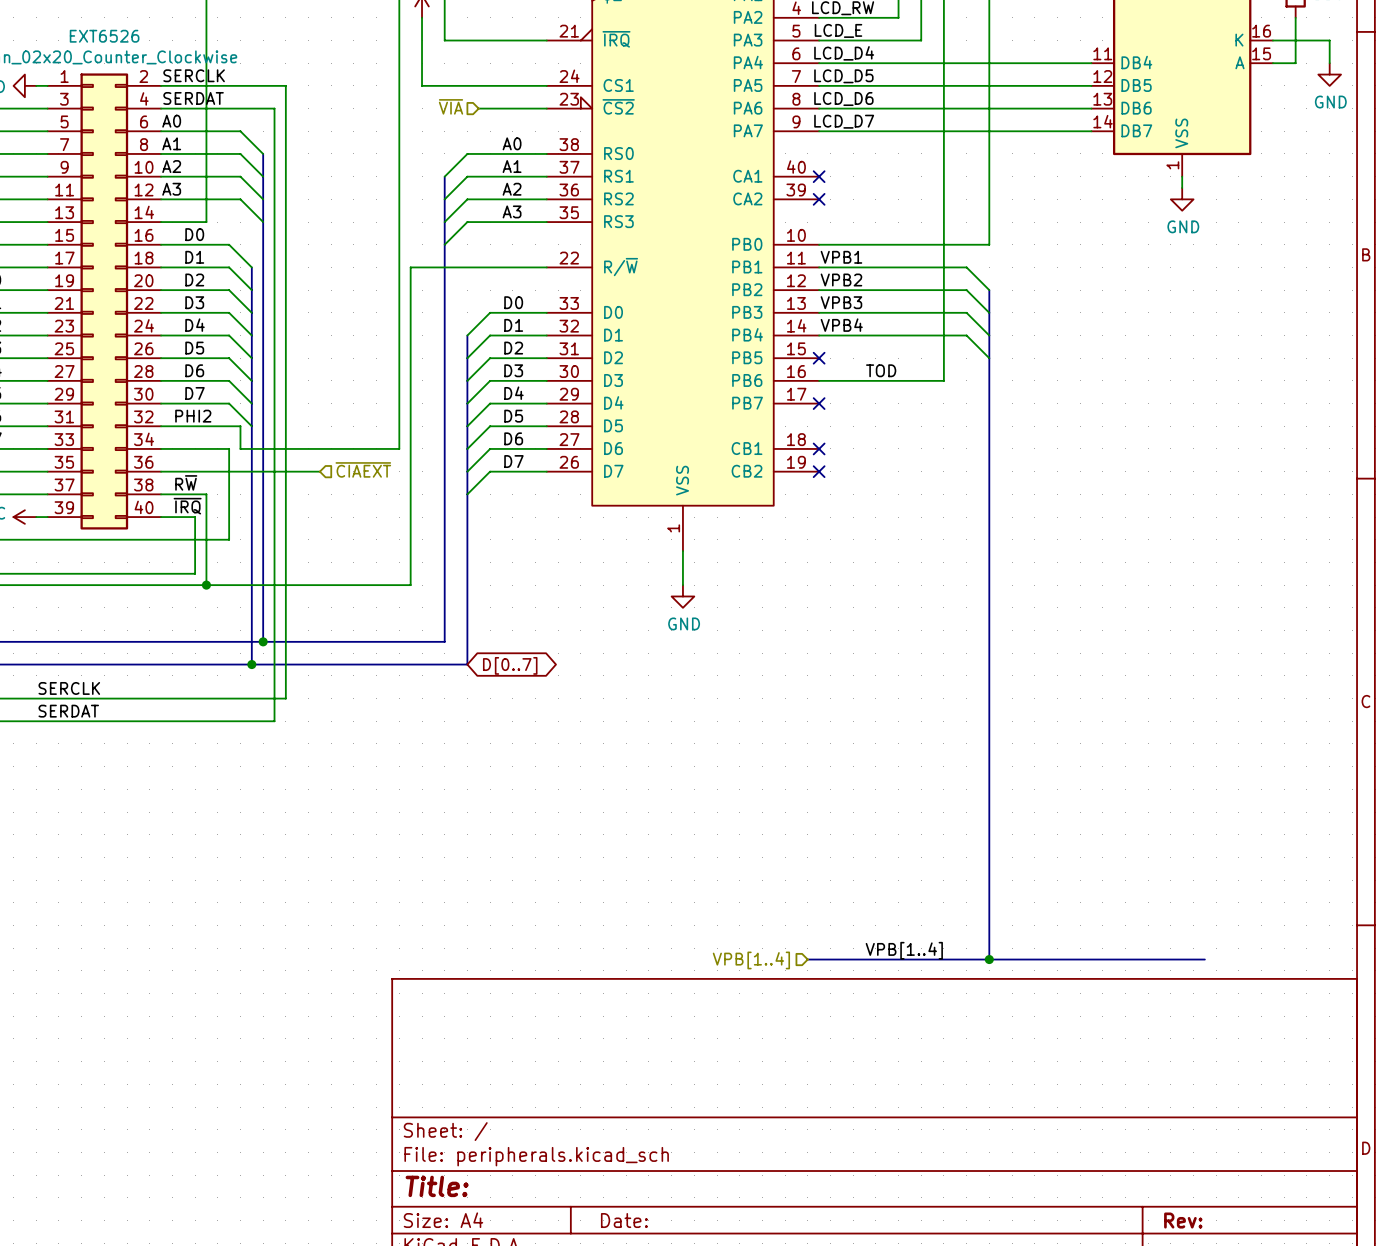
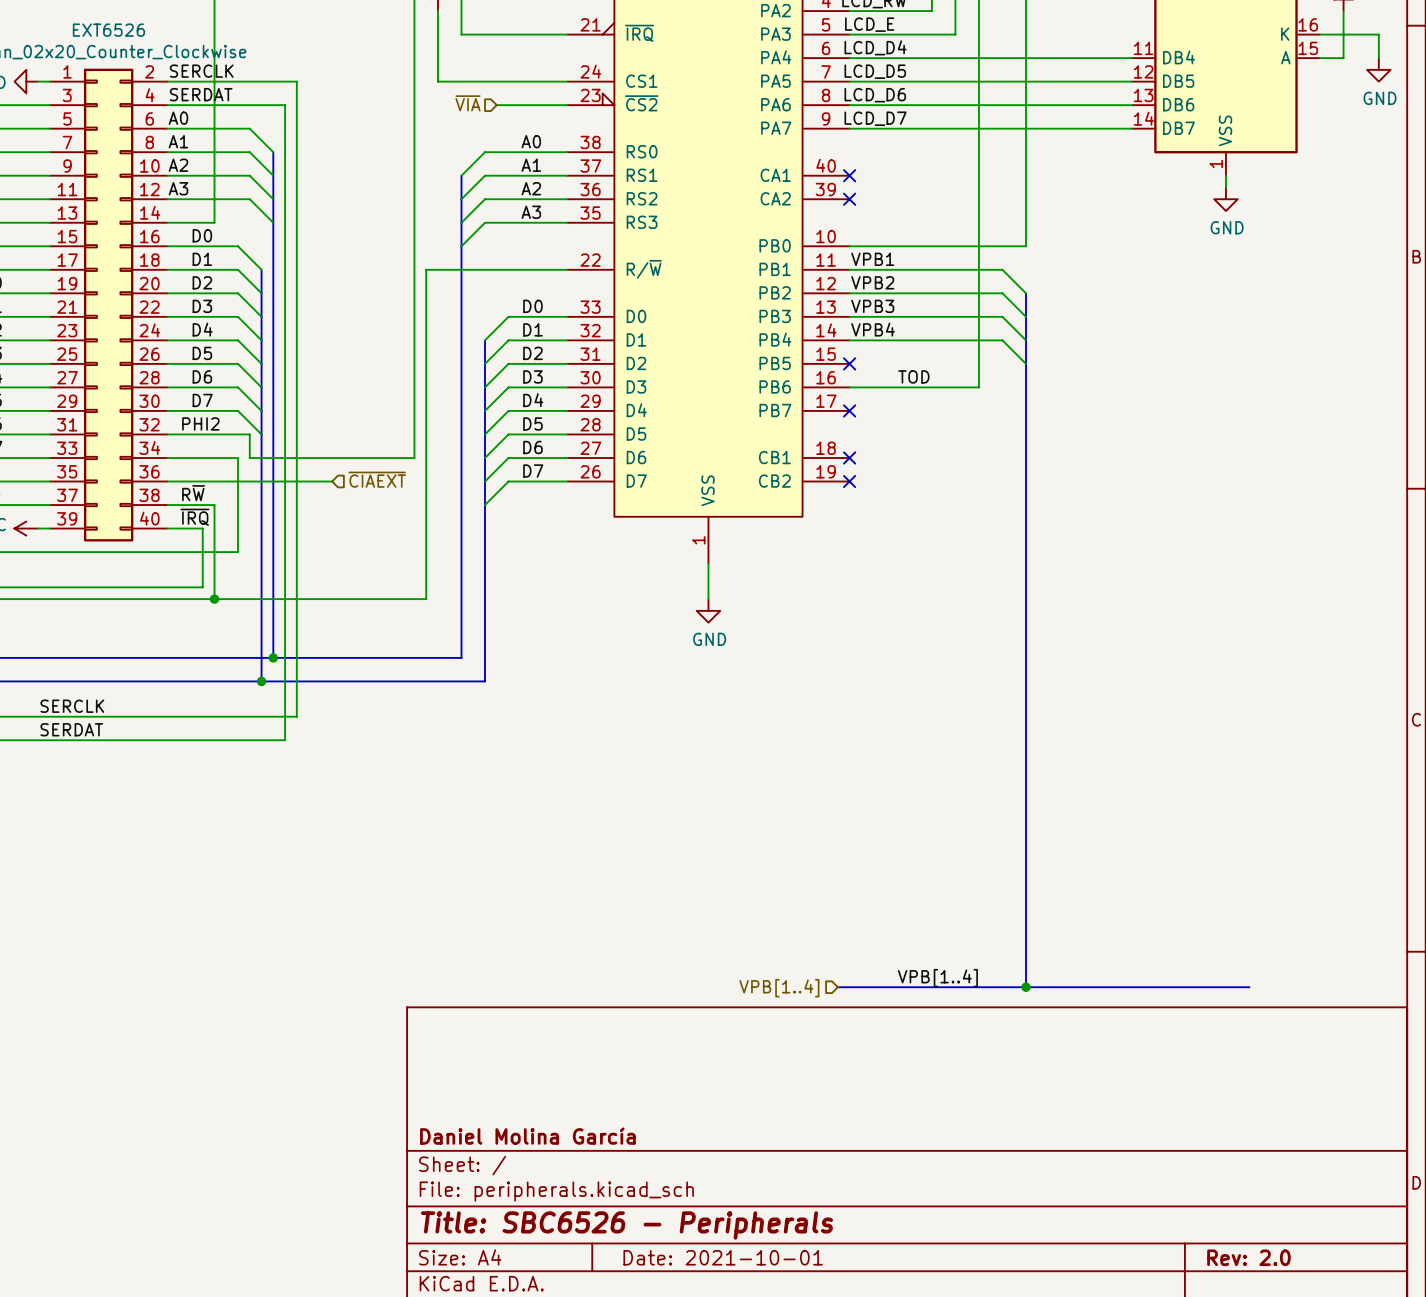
global label: D[0..7] (510, 665) -> none
title block: none -> Daniel Molina García (527, 1136)
title block: Title: (437, 1186) -> Title: SBC6526 - Peripherals (626, 1225)
title block: Date: (624, 1220) -> Date: 2021-10-01 (723, 1257)
title block: Rev: (1183, 1220) -> Rev: 2.0 (1248, 1257)

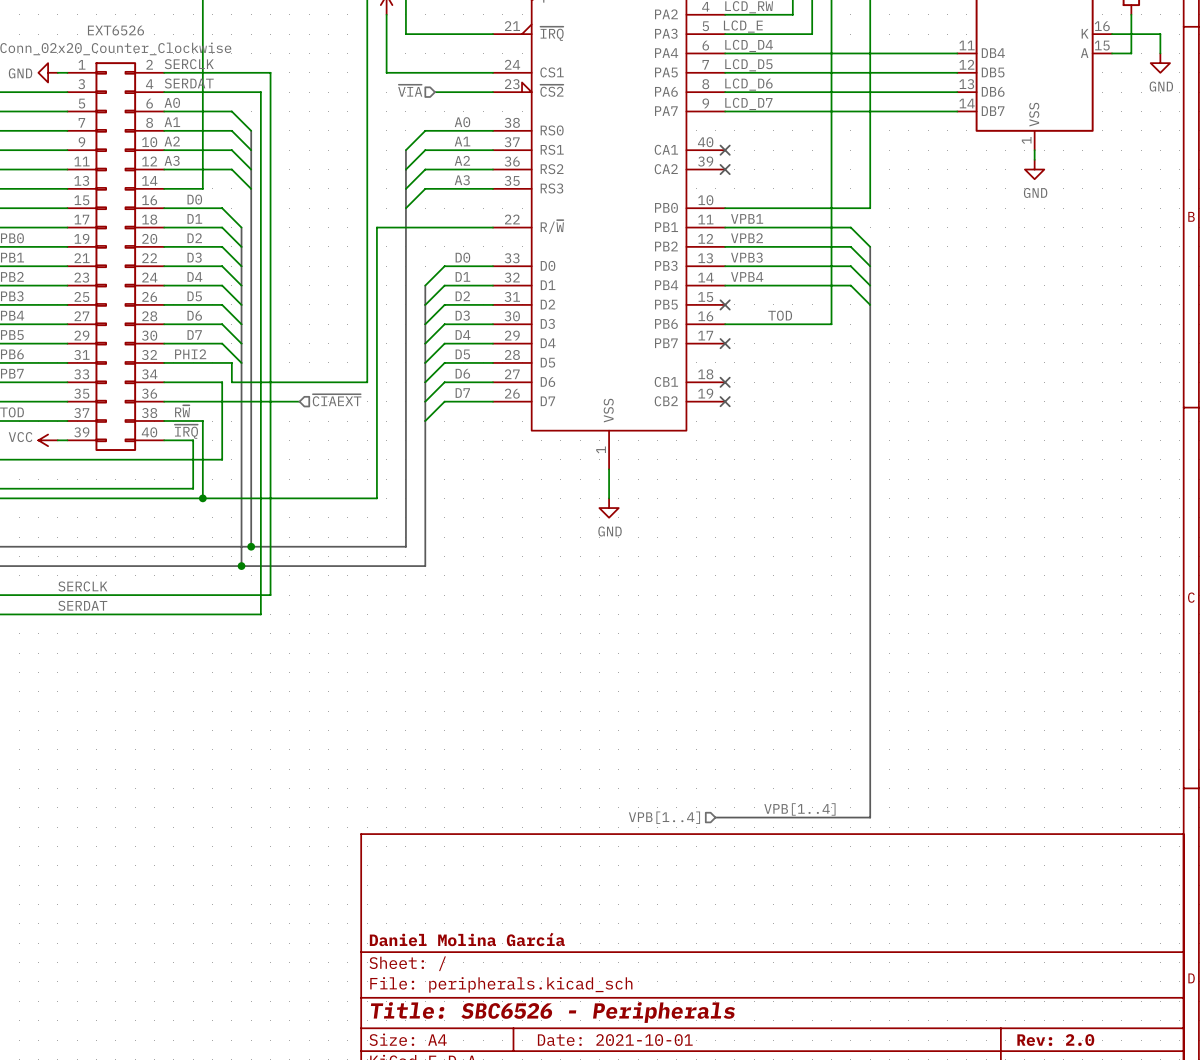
bus: (1026, 987) (1249, 987) -> none
junction: (1026, 987) -> none

